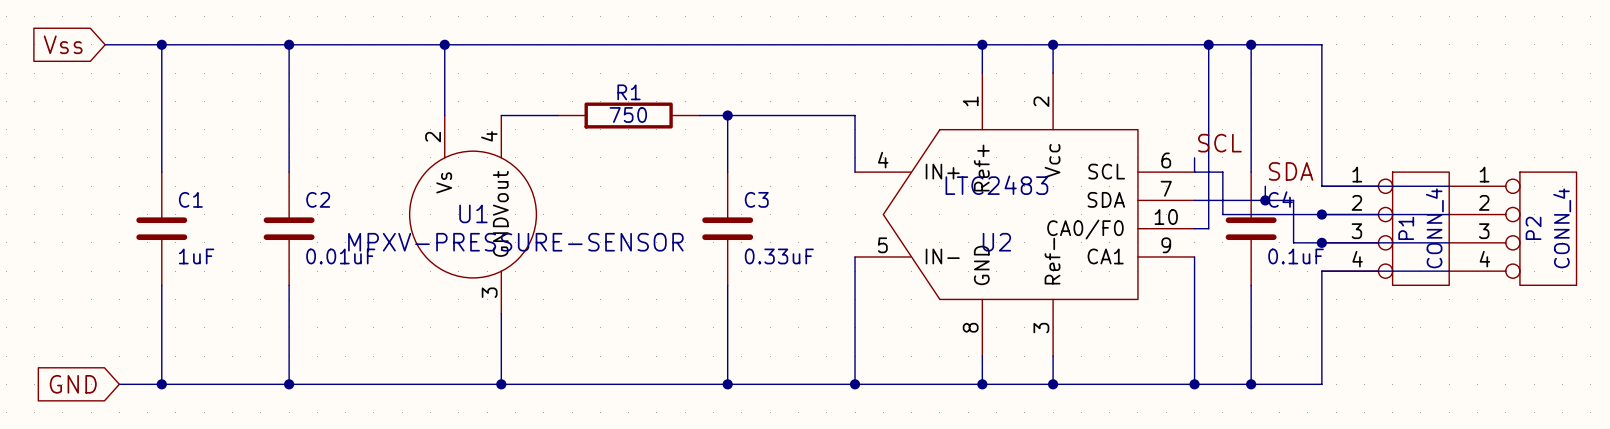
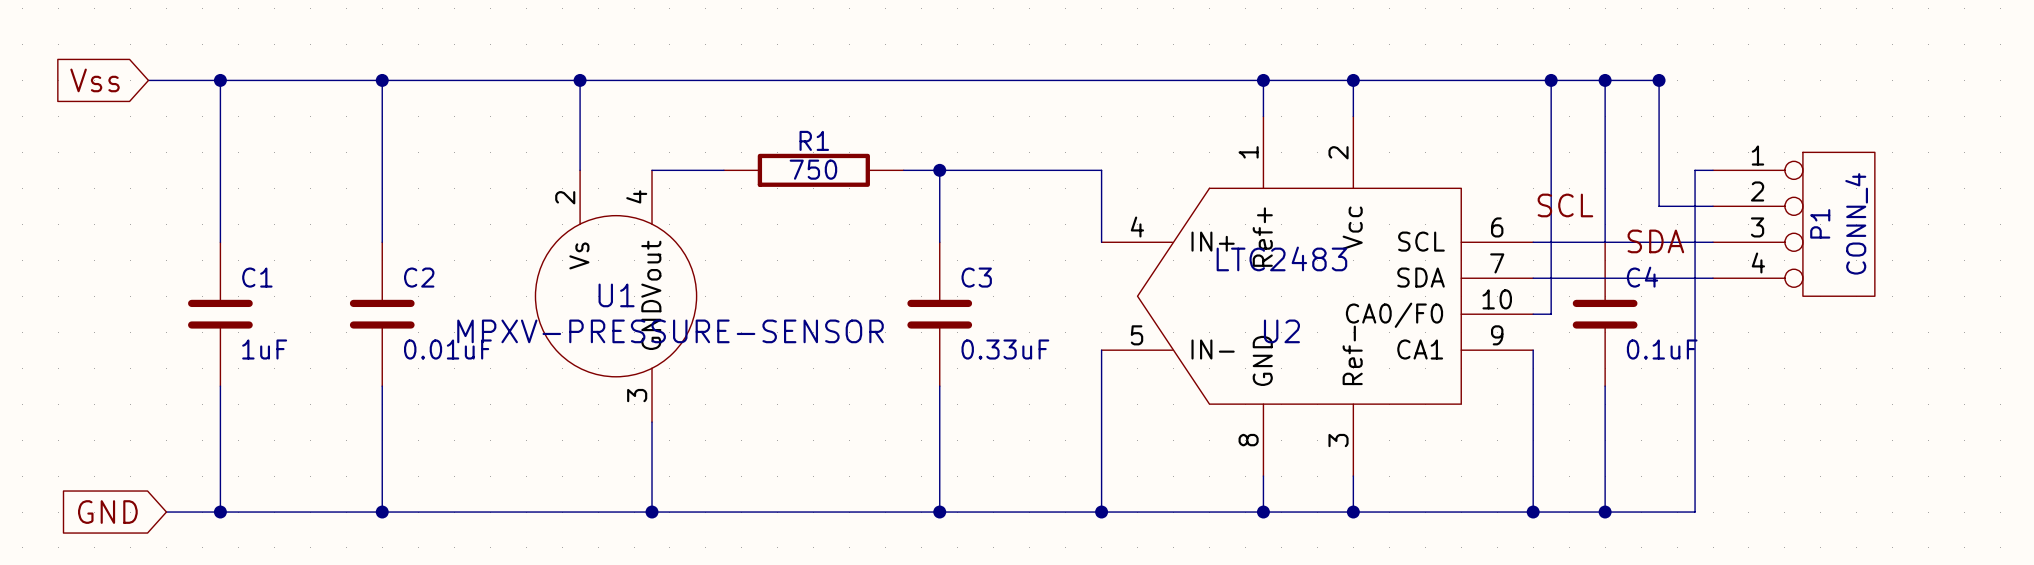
wire: (1293, 44) (1321, 44) (1321, 115) -> (1659, 80) (1659, 206) (1713, 206)
junction: none -> (1659, 80)
wire: none -> (1695, 170) (1713, 170)
wire: (1194, 157) (1194, 172) -> none
wire: (1222, 172) (1222, 214) (1449, 214) -> (1569, 242) (1713, 242)
wire: (1265, 186) (1265, 200) -> none
wire: (1321, 186) (1449, 186) -> (1695, 260) (1695, 368)
junction: (1265, 200) -> none
wire: (1293, 200) (1293, 242) (1449, 242) -> (1659, 278) (1713, 278)
junction: (1321, 214) -> none
P1 position: (1385, 228) -> (1793, 224)
P2: CONN_4 (1512, 228) -> none
junction: (1321, 242) -> none
wire: (1321, 271) (1449, 271) -> none

